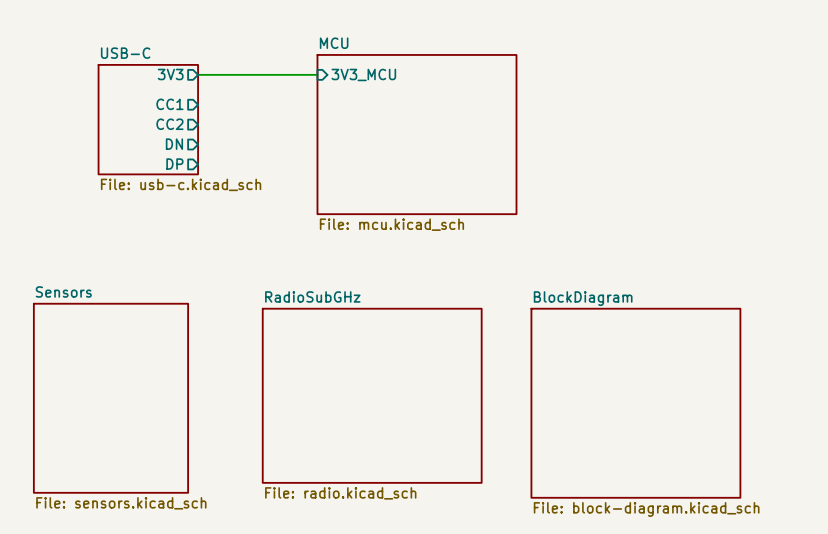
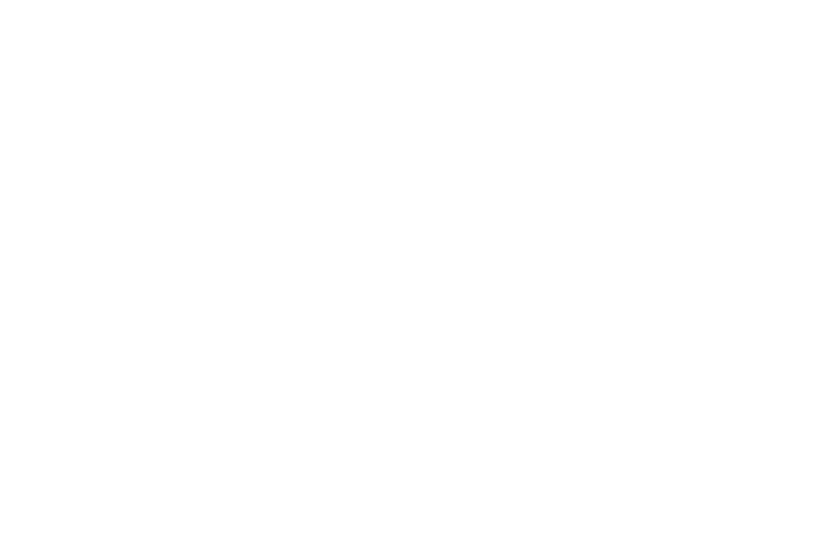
sheet pin: 3V3 (170, 74) -> none
wire: (198, 74) (317, 74) -> none
sheet pin: 3V3_MCU (363, 74) -> none
sheet pin: CC1 (169, 104) -> none
sheet USB-C: File: usb-c.kicad_sch (148, 119) -> none
sheet pin: CC2 (169, 124) -> none
sheet MCU: File: mcu.kicad_sch (416, 134) -> none
sheet pin: DN (174, 144) -> none
sheet pin: DP (174, 164) -> none
sheet RadioSubGHz: File: radio.kicad_sch (372, 395) -> none
sheet Sensors: File: sensors.kicad_sch (110, 398) -> none
sheet BlockDiagram: File: block-diagram.kicad_sch (635, 403) -> none

